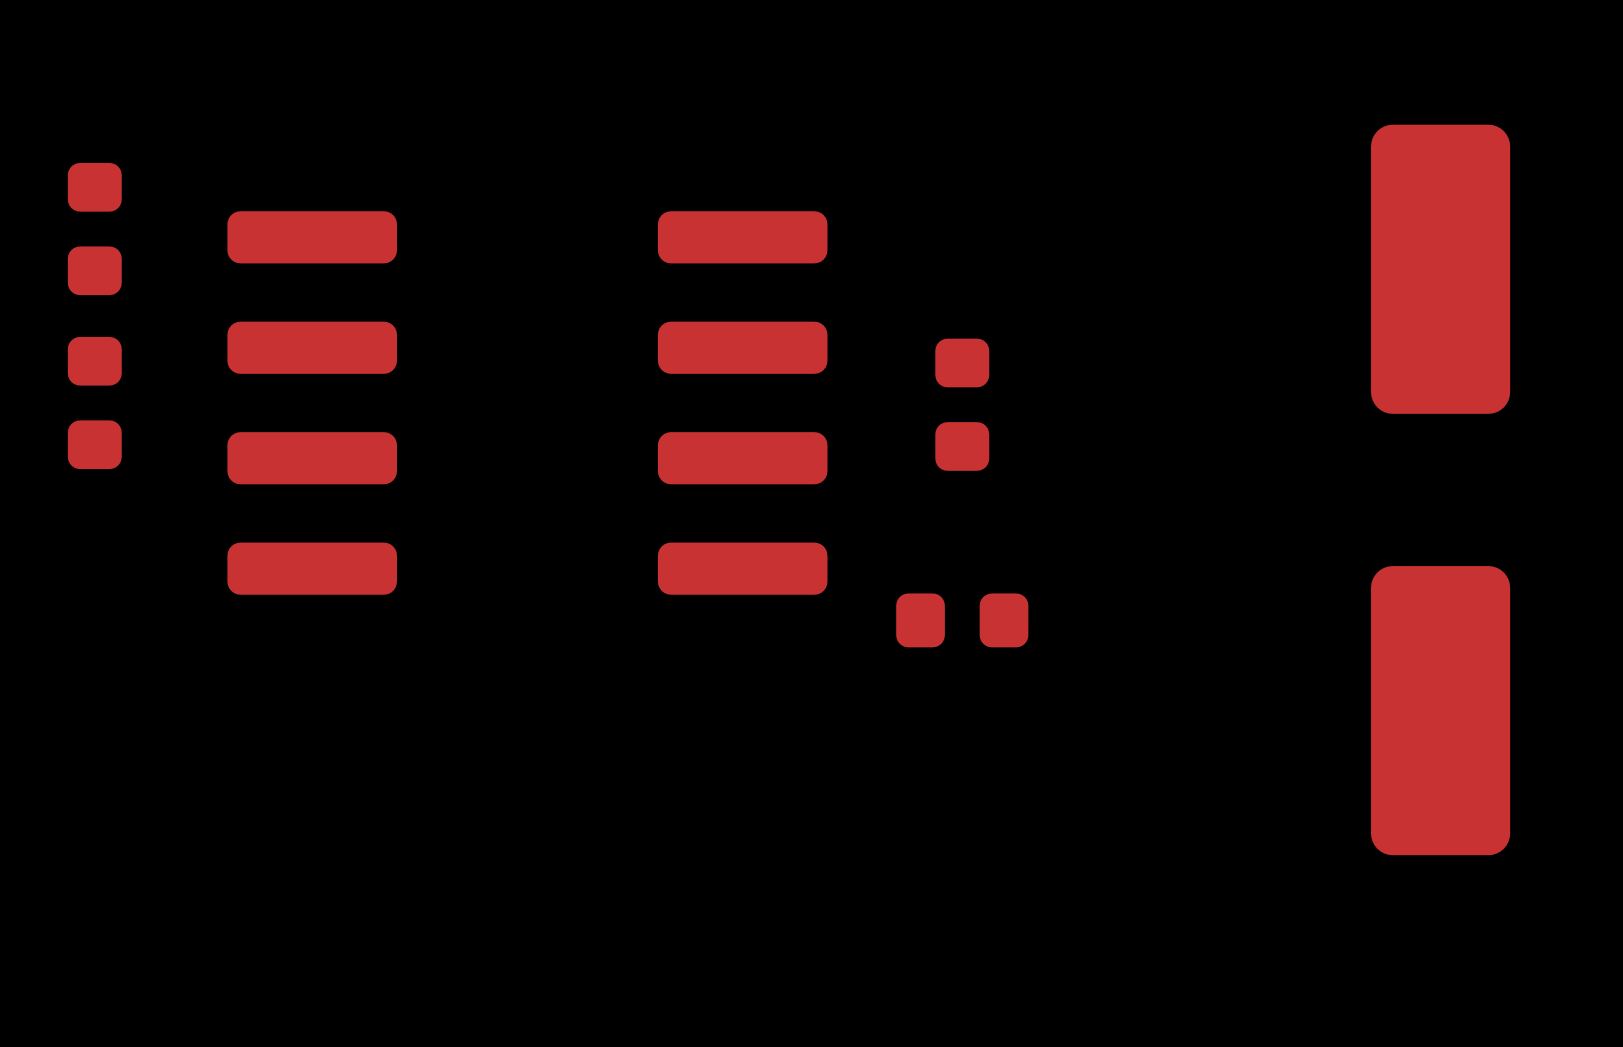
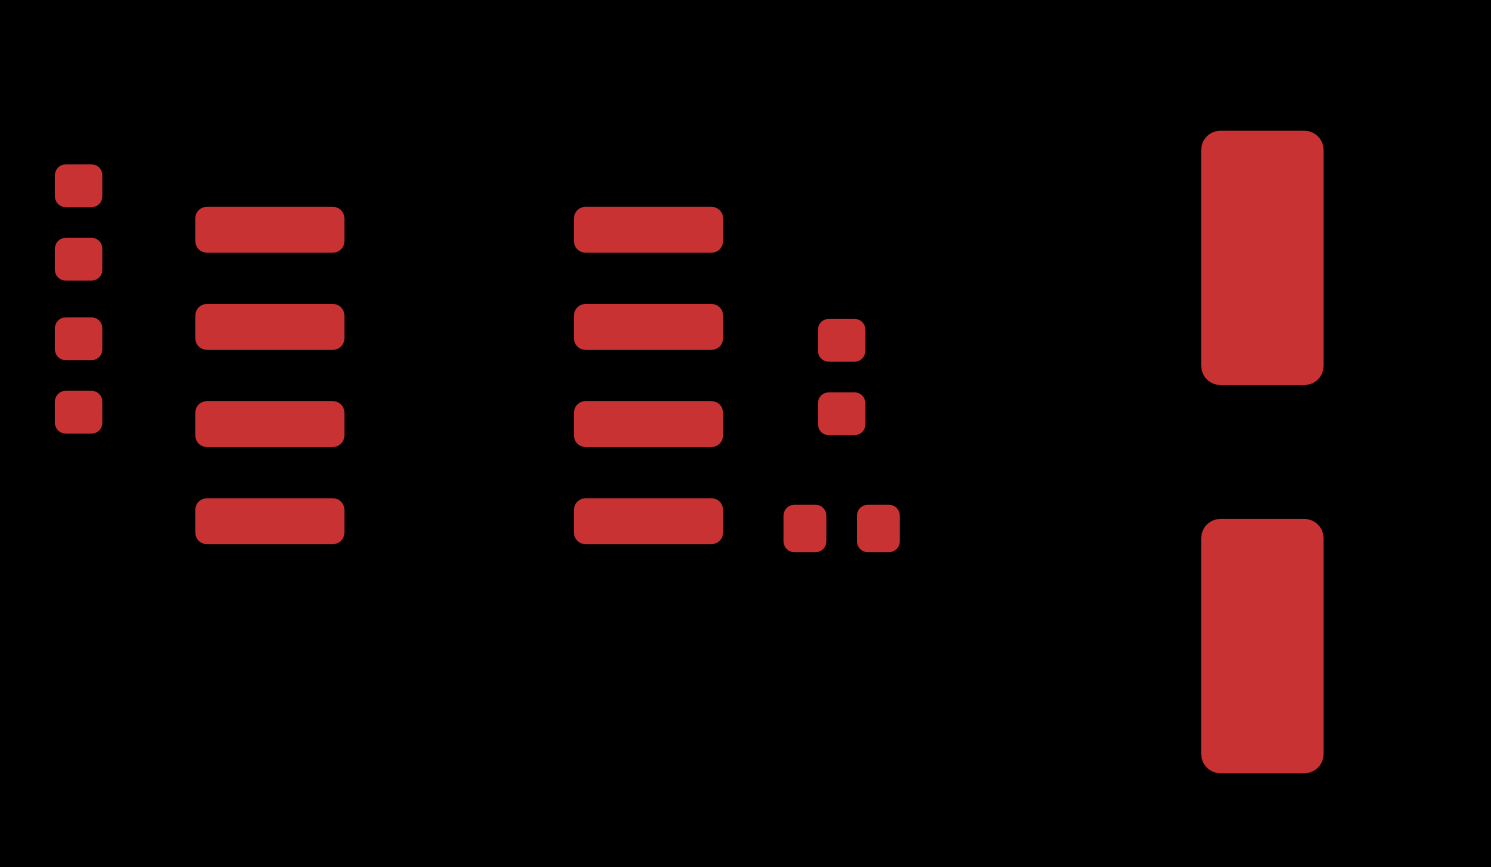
part position: (962, 620) -> (841, 528)

